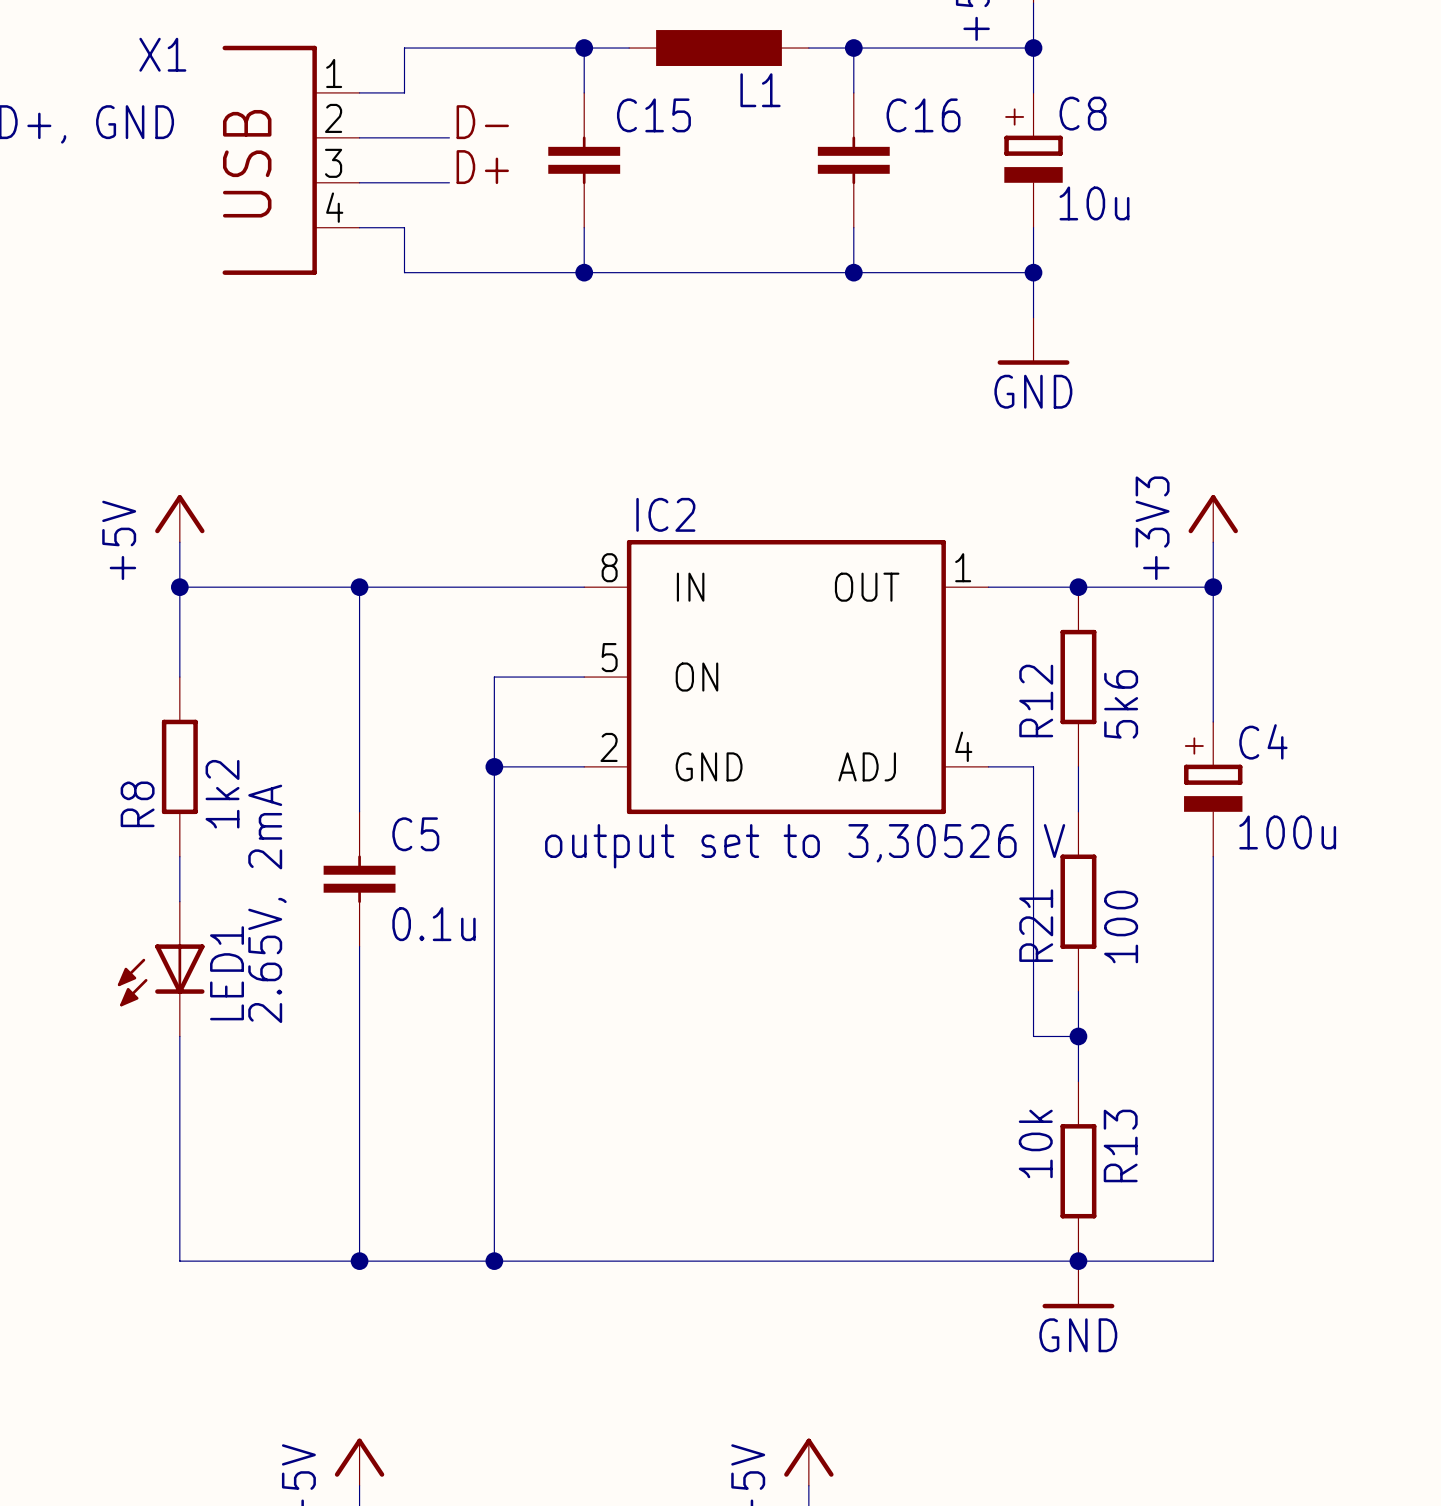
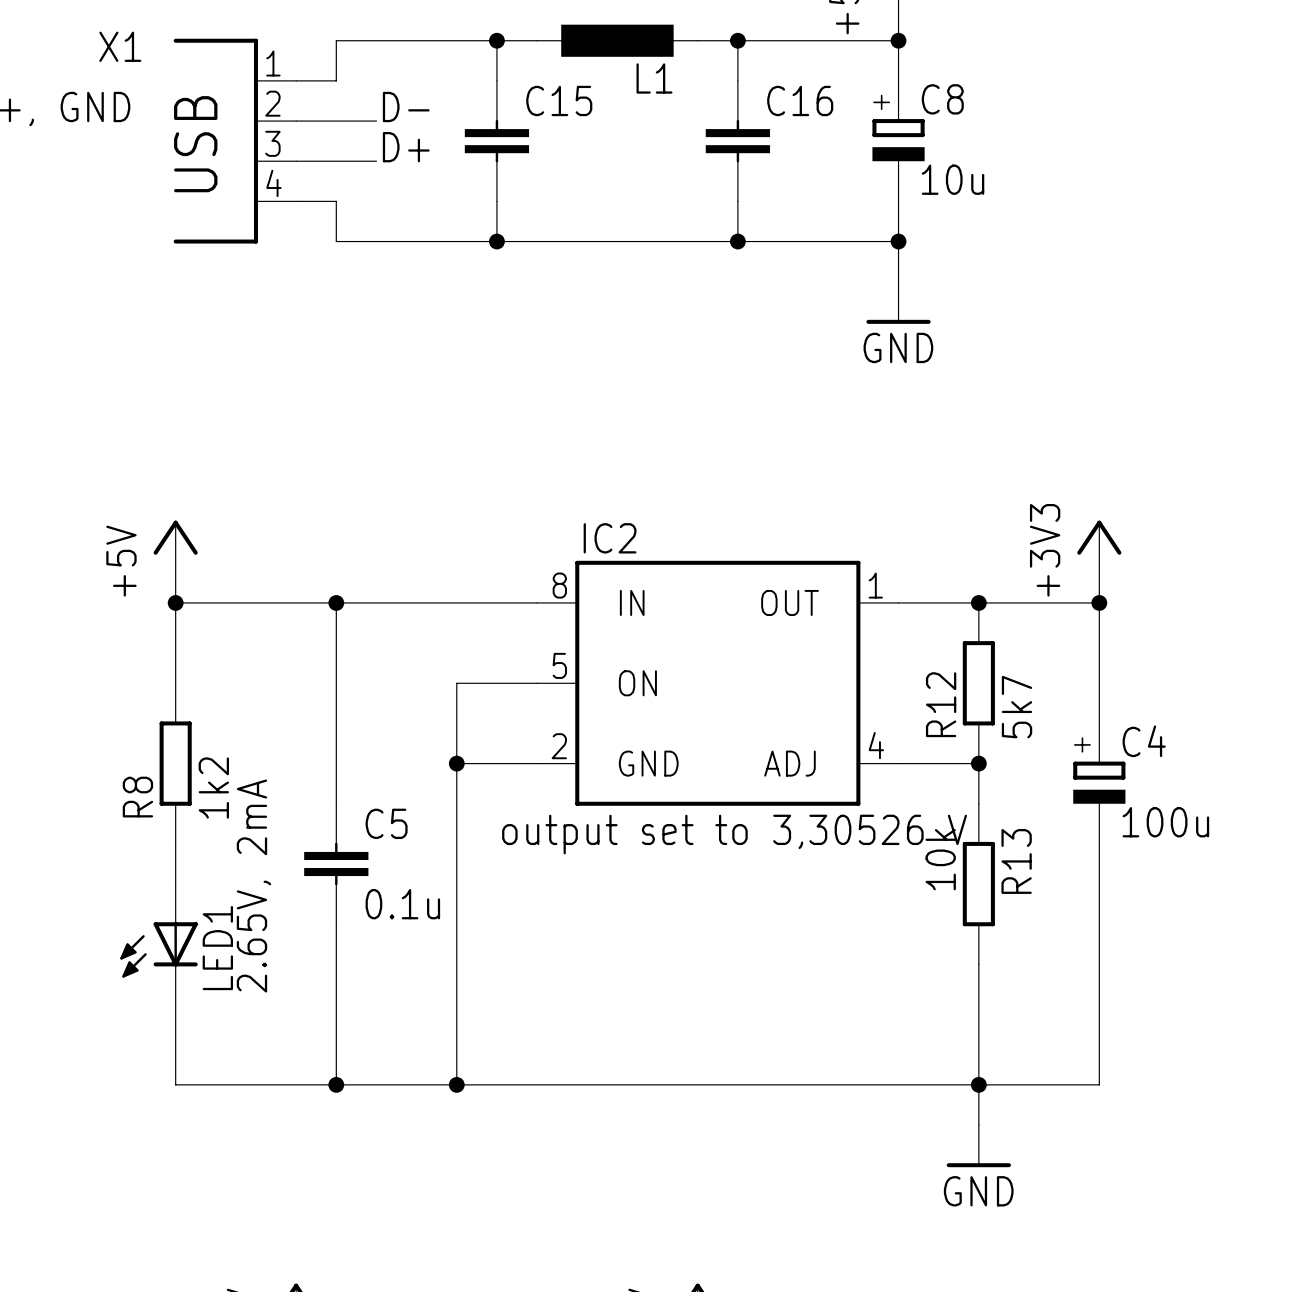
power symbol position: +5V (179, 518) -> +5V (175, 541)
power symbol position: +3V3 (1213, 518) -> +3V3 (1099, 541)
wire: (179, 542) (179, 677) -> (175, 562) (175, 683)
wire: (1213, 542) (1213, 721) -> (1099, 562) (1099, 723)
wire: (179, 587) (584, 587) -> none
junction: (179, 587) -> none
wire: (359, 587) (359, 811) -> (336, 602) (336, 803)
junction: (359, 587) -> none
wire: (988, 587) (1213, 587) -> (898, 602) (1099, 602)
junction: (1078, 587) -> none
junction: (1213, 587) -> none
junction: none -> (175, 602)
junction: none -> (336, 602)
wire: (494, 677) (494, 1261) -> (416, 602) (175, 602)
IC2 position: (786, 677) -> (717, 683)
R12 position: (1078, 677) -> (978, 683)
junction: none -> (978, 602)
junction: none -> (1099, 602)
R12 value: 5k6 (1121, 704) -> 5k7 (1017, 707)
R8 position: (179, 766) -> (175, 763)
wire: (494, 766) (539, 766) -> (456, 1084) (456, 683)
junction: (494, 766) -> none
wire: (988, 766) (1033, 766) (1033, 1036) (1078, 1036) -> none
wire: (1078, 766) (1078, 811) -> none
C4 position: (1213, 789) -> (1099, 783)
text position: output set to 3,30526 V (805, 846) -> output set to 3,30526 V (734, 834)
wire: (179, 856) (179, 901) -> (175, 843) (175, 884)
wire: none -> (456, 763) (537, 763)
junction: none -> (456, 763)
wire: none -> (898, 763) (978, 763) (978, 803)
junction: none -> (978, 763)
wire: (1213, 856) (1213, 1261) (179, 1261) (179, 1036) -> none
C5 position: (359, 879) -> (336, 864)
R21: 100 (1078, 901) -> none
wire: (359, 946) (359, 1261) -> none
wire: none -> (1099, 843) (1099, 1084) (175, 1084) (175, 1004)
LED1 position: (161, 969) -> (159, 944)
wire: (1078, 991) (1078, 1081) -> none
wire: none -> (336, 924) (336, 1084)
junction: (1078, 1036) -> none
wire: none -> (978, 964) (978, 1125)
R13 position: (1078, 1171) -> (978, 884)
junction: none -> (336, 1084)
junction: none -> (456, 1084)
junction: (359, 1261) -> none
junction: (494, 1261) -> none
junction position: (1078, 1261) -> (978, 1084)
power symbol position: GND (1078, 1284) -> GND (978, 1146)

